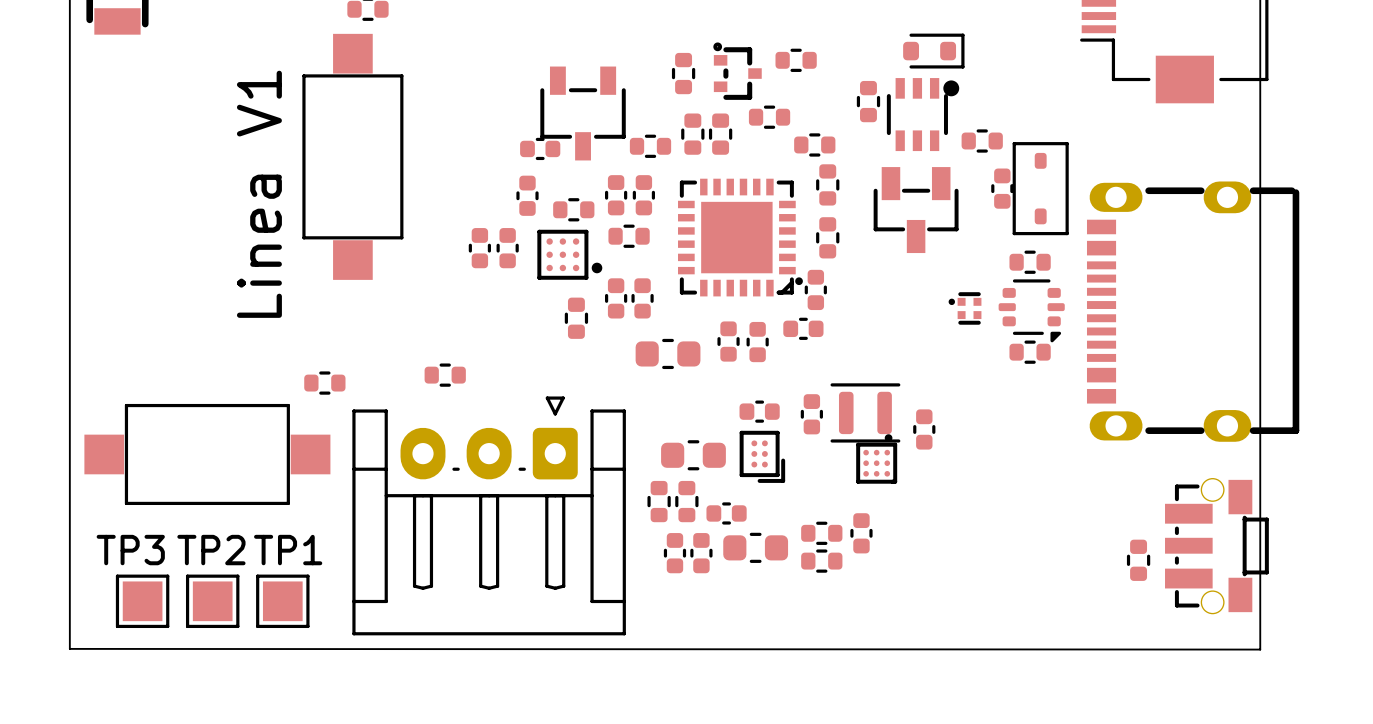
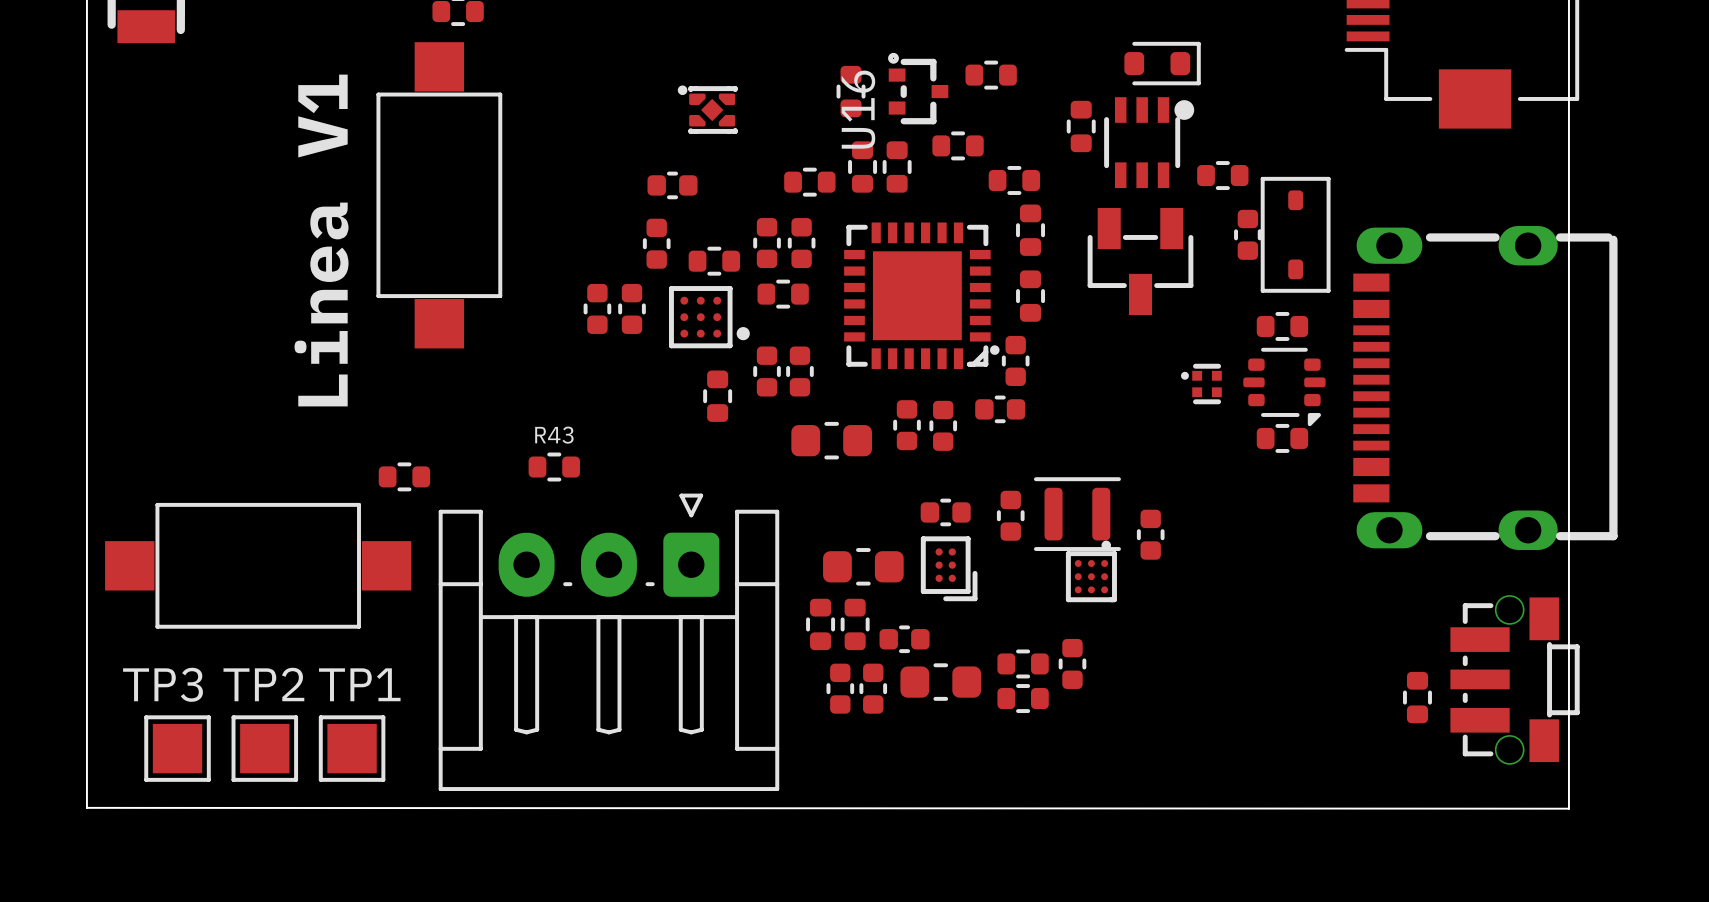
U16: none -> (707, 109)
part: (583, 113) -> none
R43 name: none -> R43 (554, 435)

